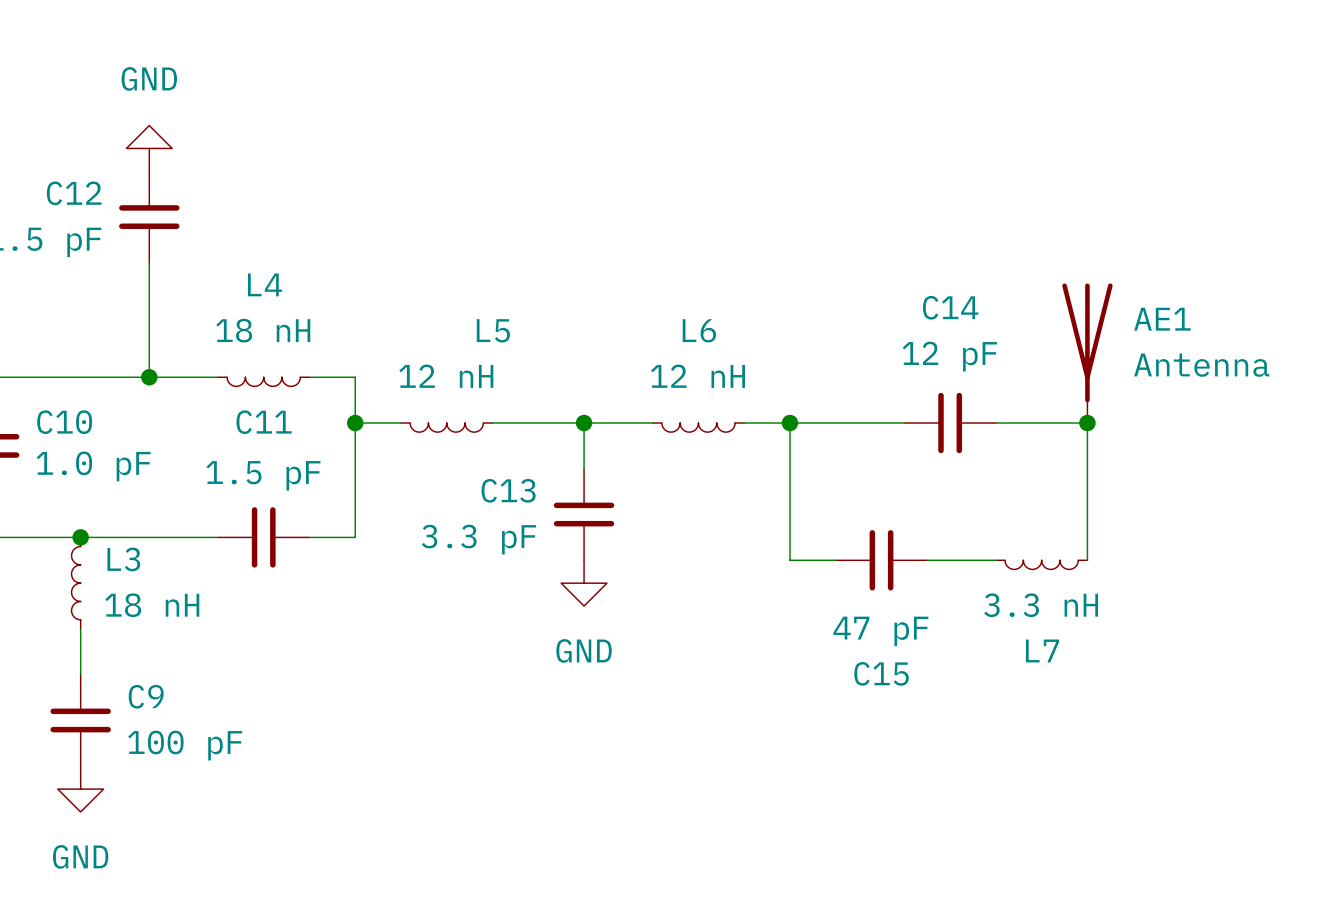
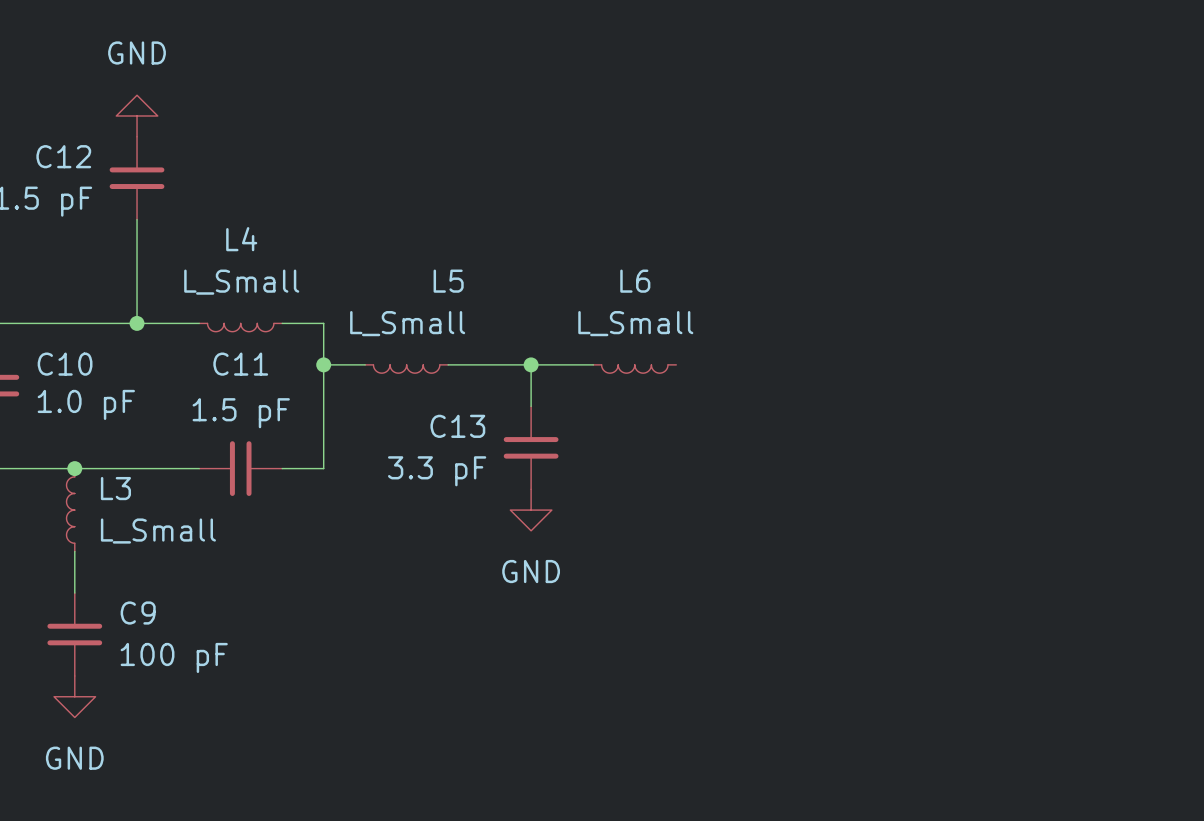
L4 value: 18 nH (263, 330) -> L_Small (241, 282)
AE1: Antenna (1087, 353) -> none
L5 value: 12 nH (446, 376) -> L_Small (407, 323)
L6 value: 12 nH (698, 376) -> L_Small (635, 323)
wire: (744, 423) (904, 423) -> none
wire: (789, 423) (789, 560) (835, 560) -> none
junction: (789, 423) -> none
C14: 12 pF (950, 423) -> none
wire: (995, 423) (1087, 423) (1087, 560) -> none
junction: (1087, 423) -> none
C15: 47 pF (881, 560) -> none
wire: (927, 560) (995, 560) -> none
L7: 3.3 nH (1041, 564) -> none
L3 value: 18 nH (152, 605) -> L_Small (158, 531)

